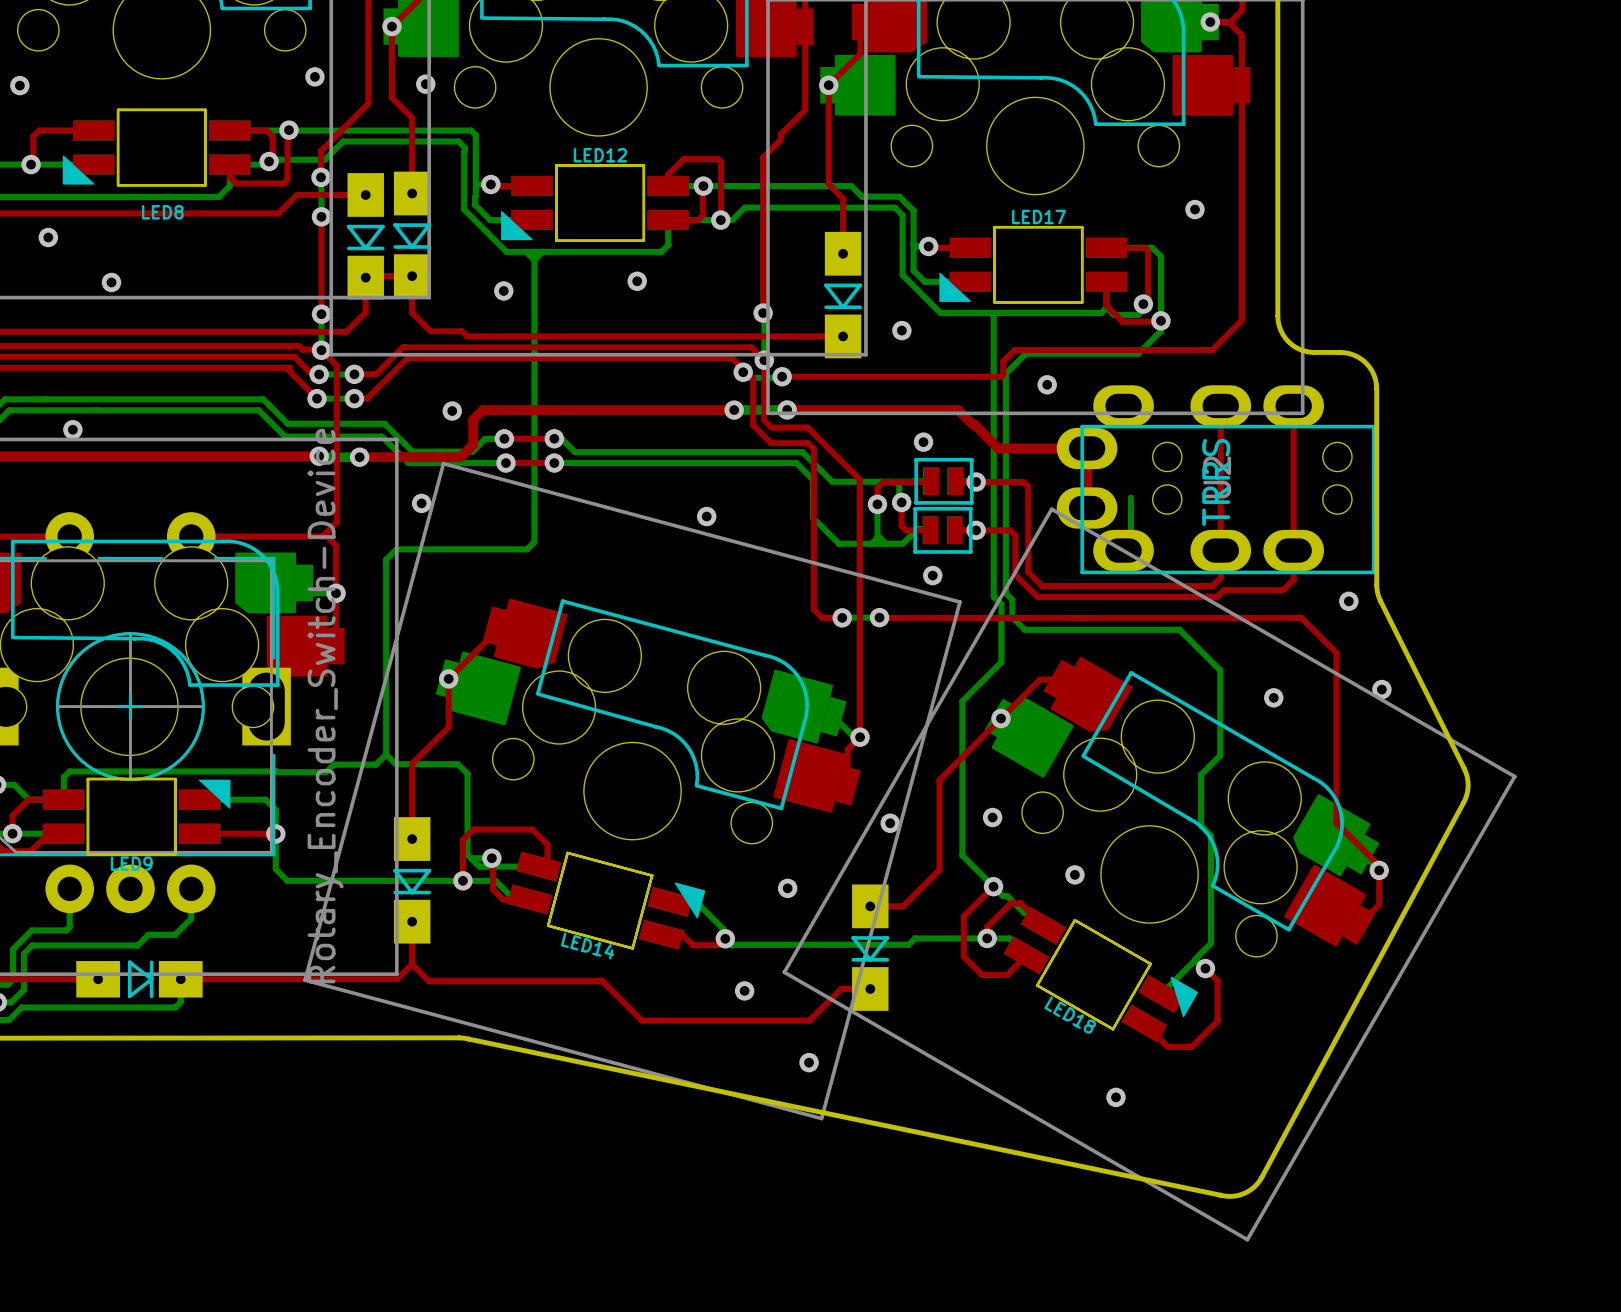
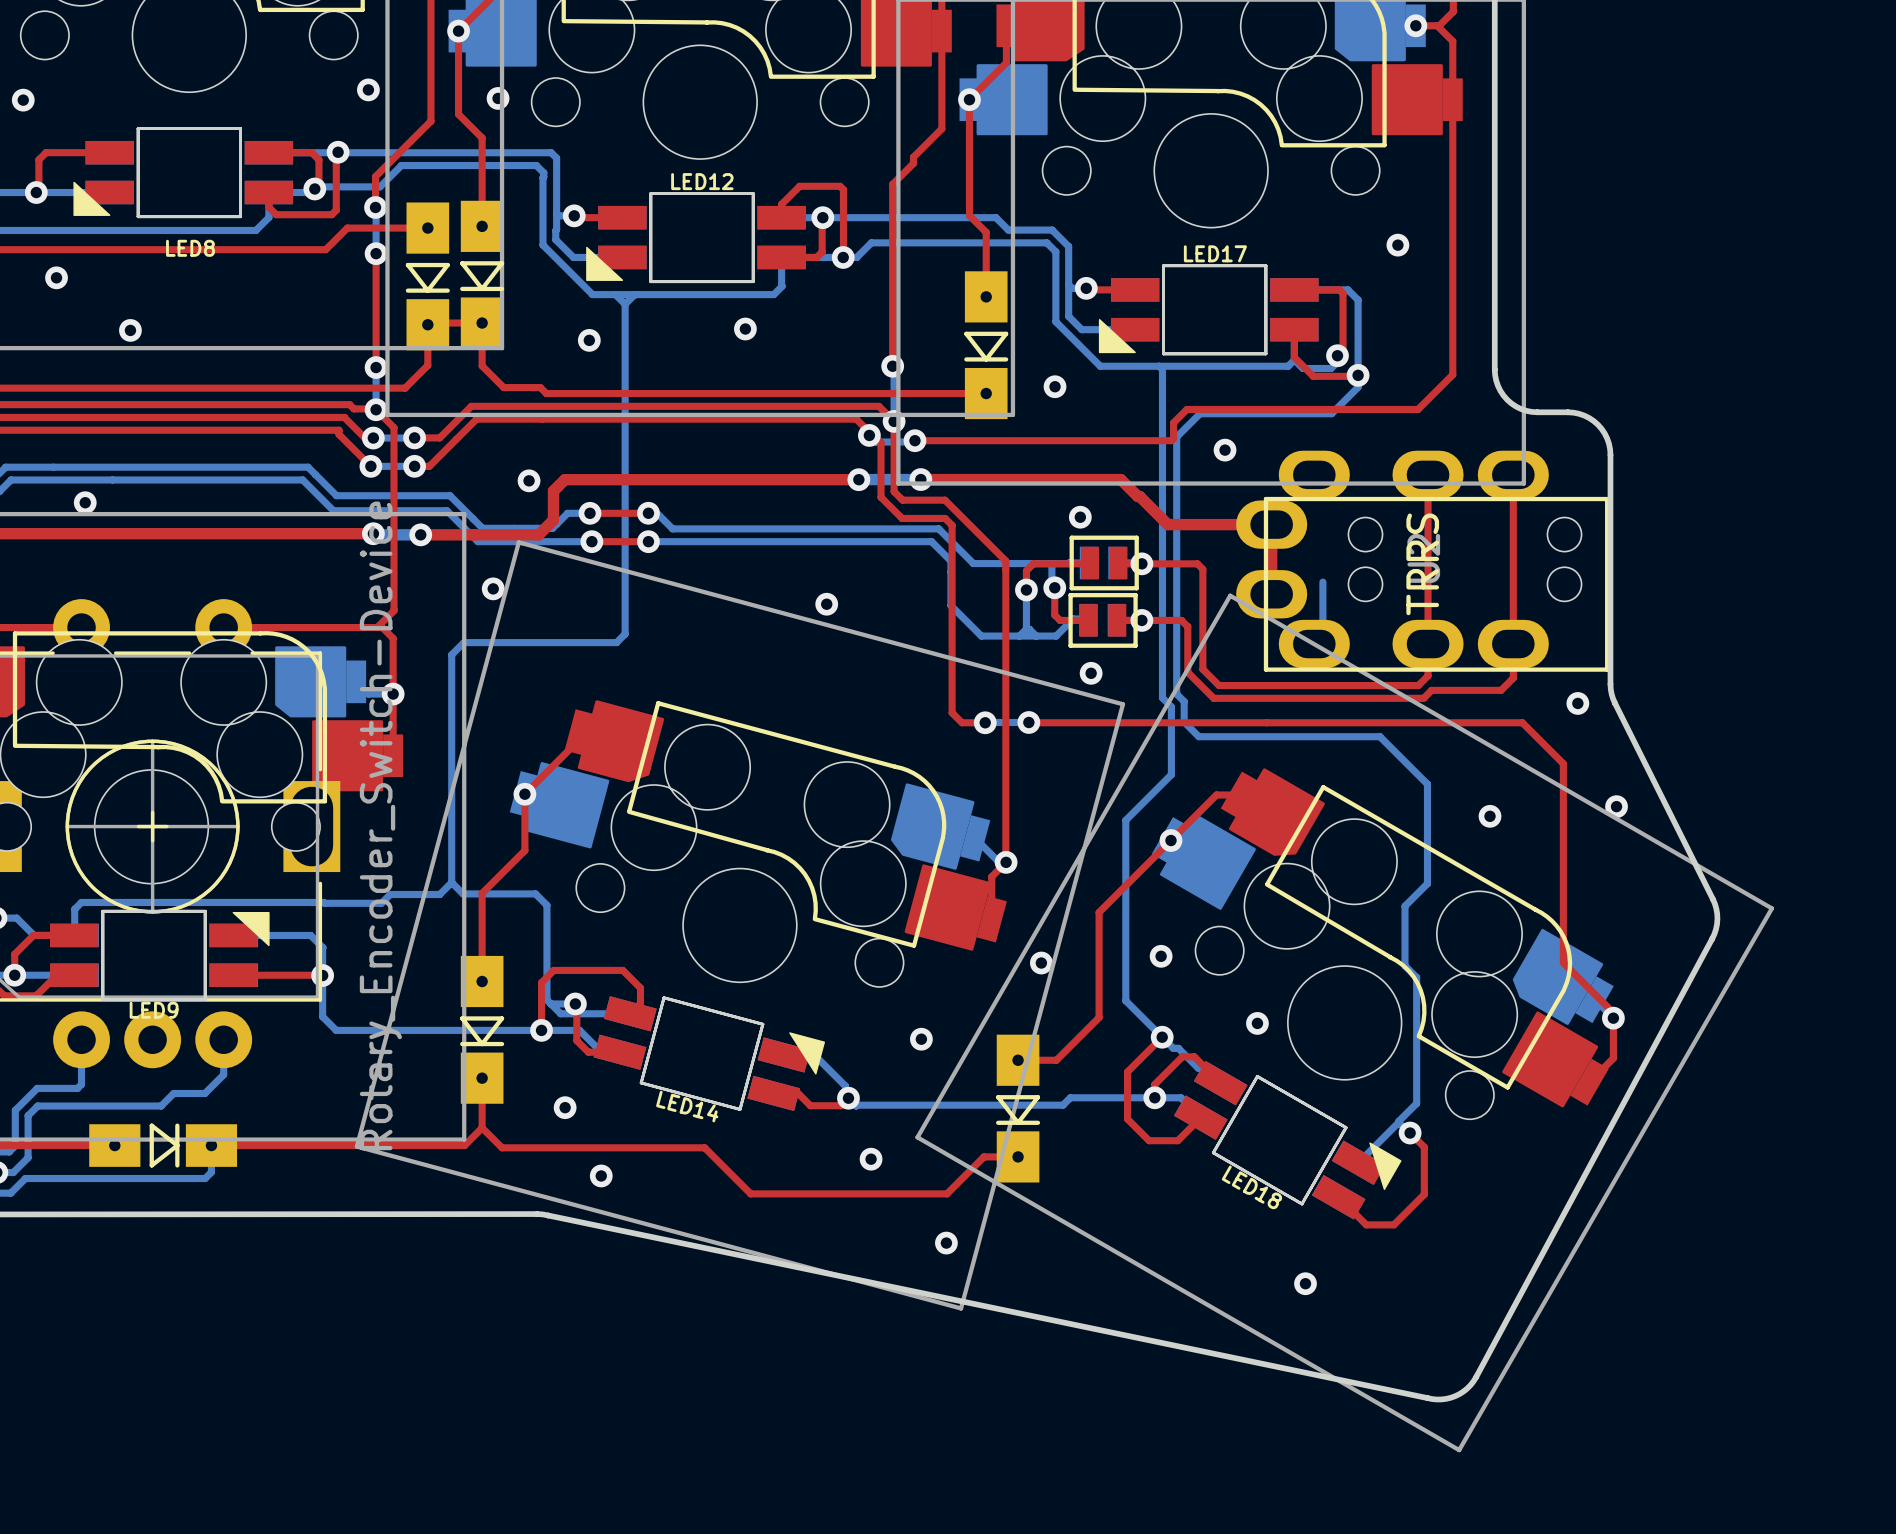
via: none -> (565, 1107)
via: none -> (601, 1175)

